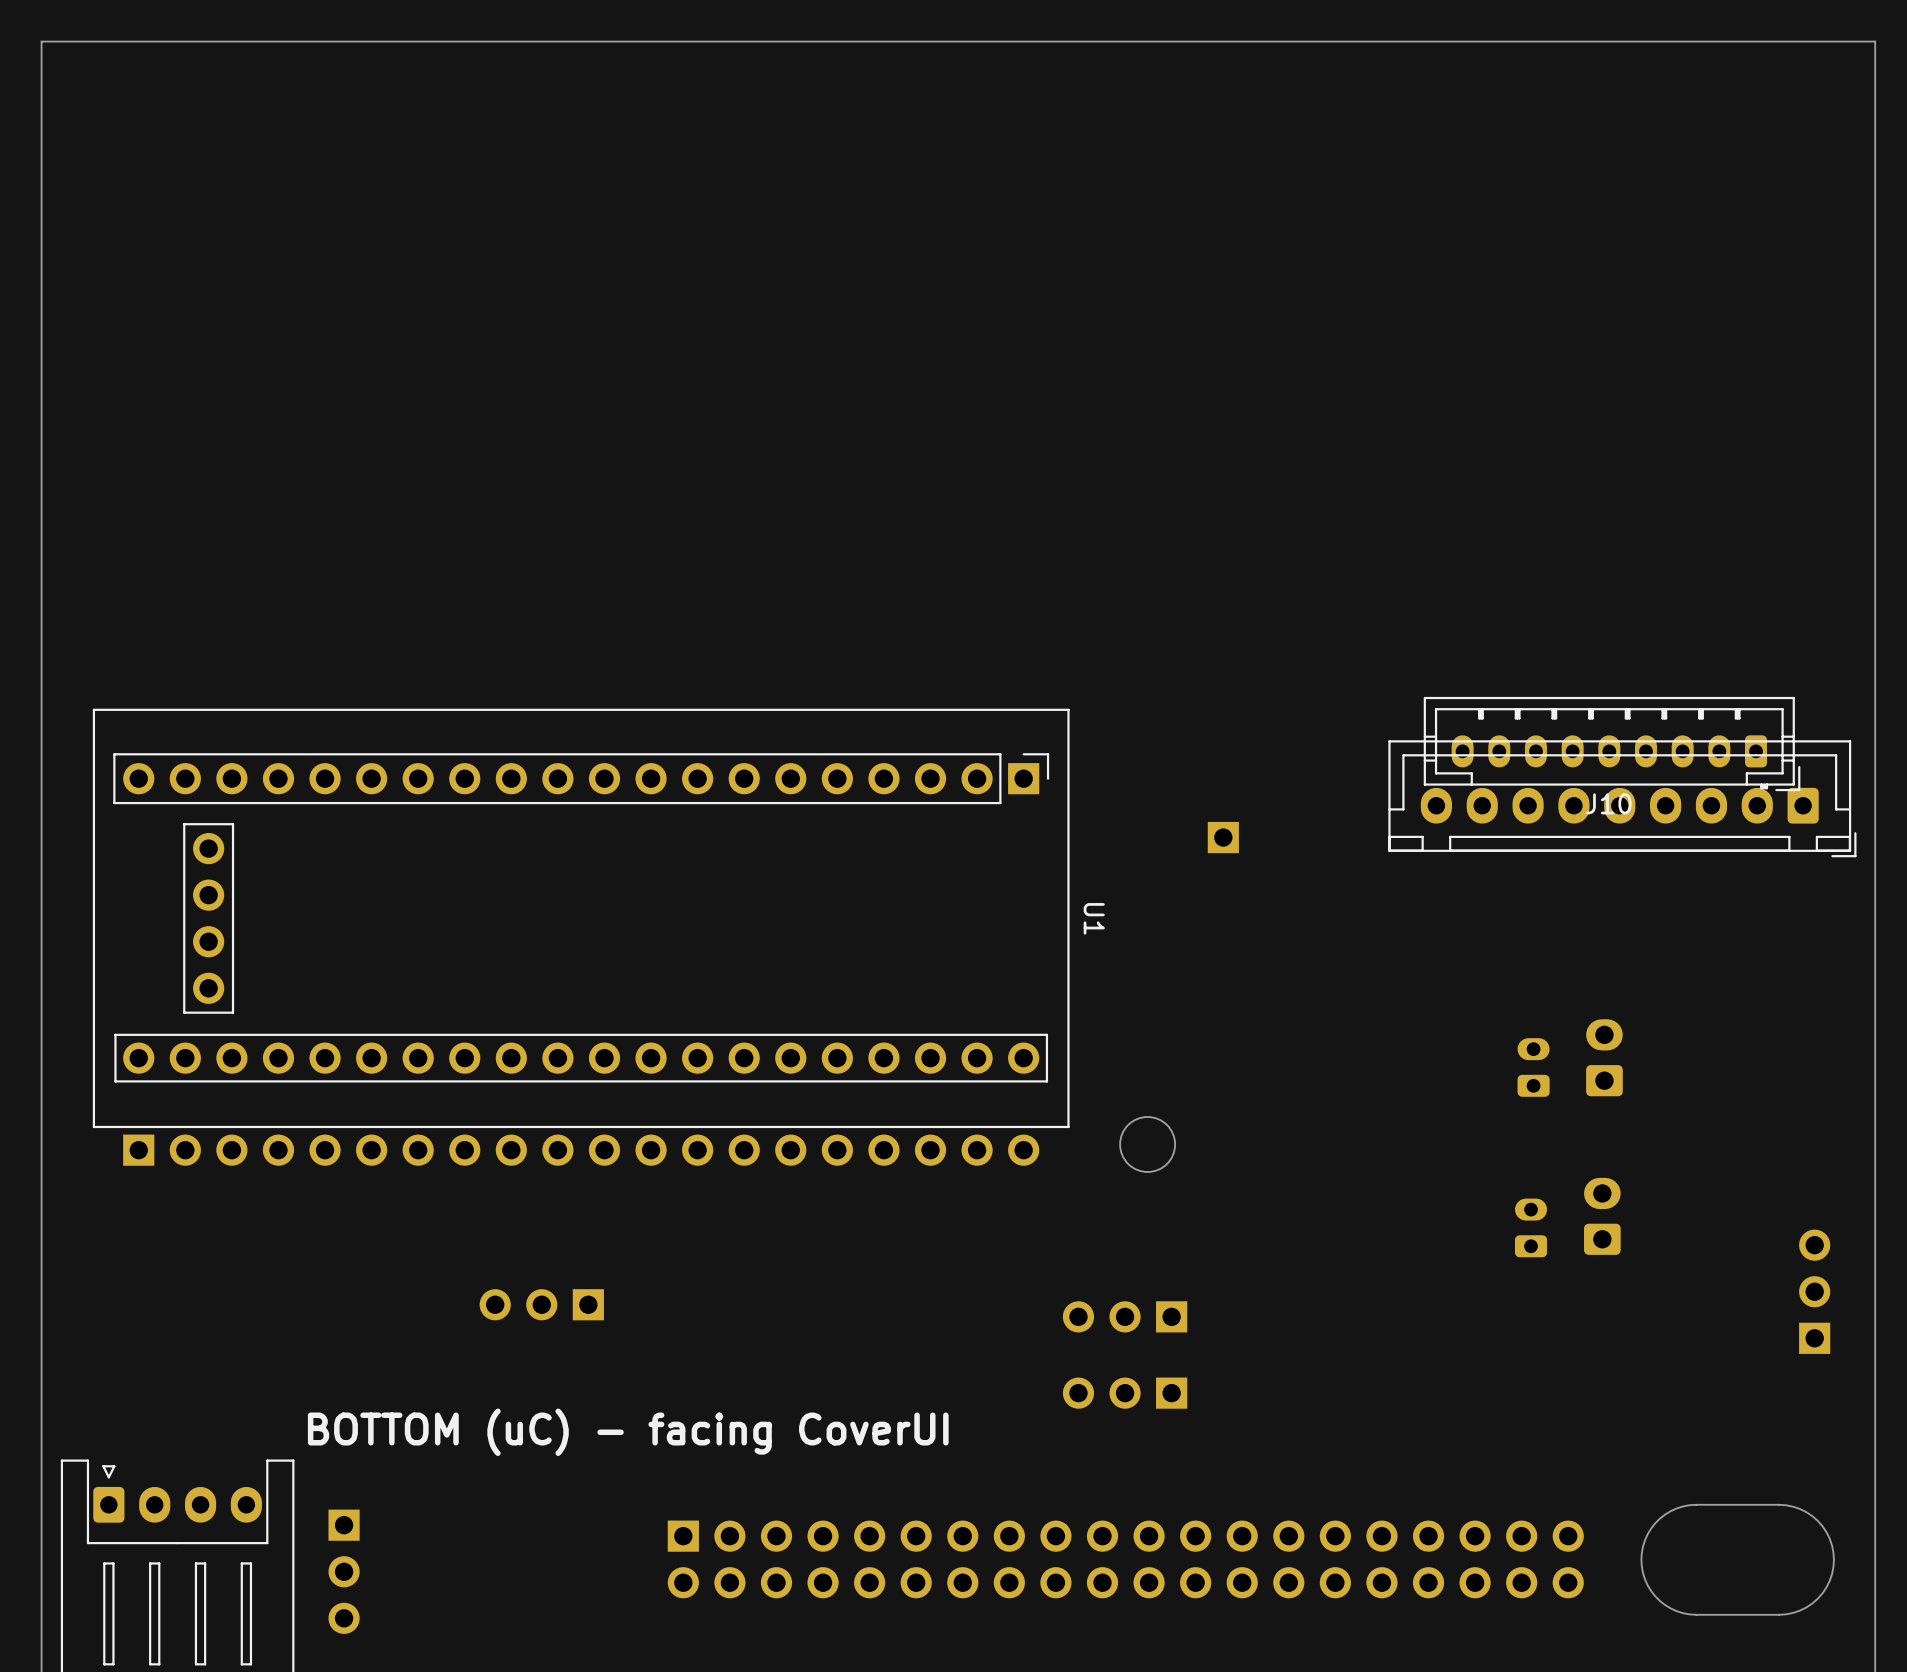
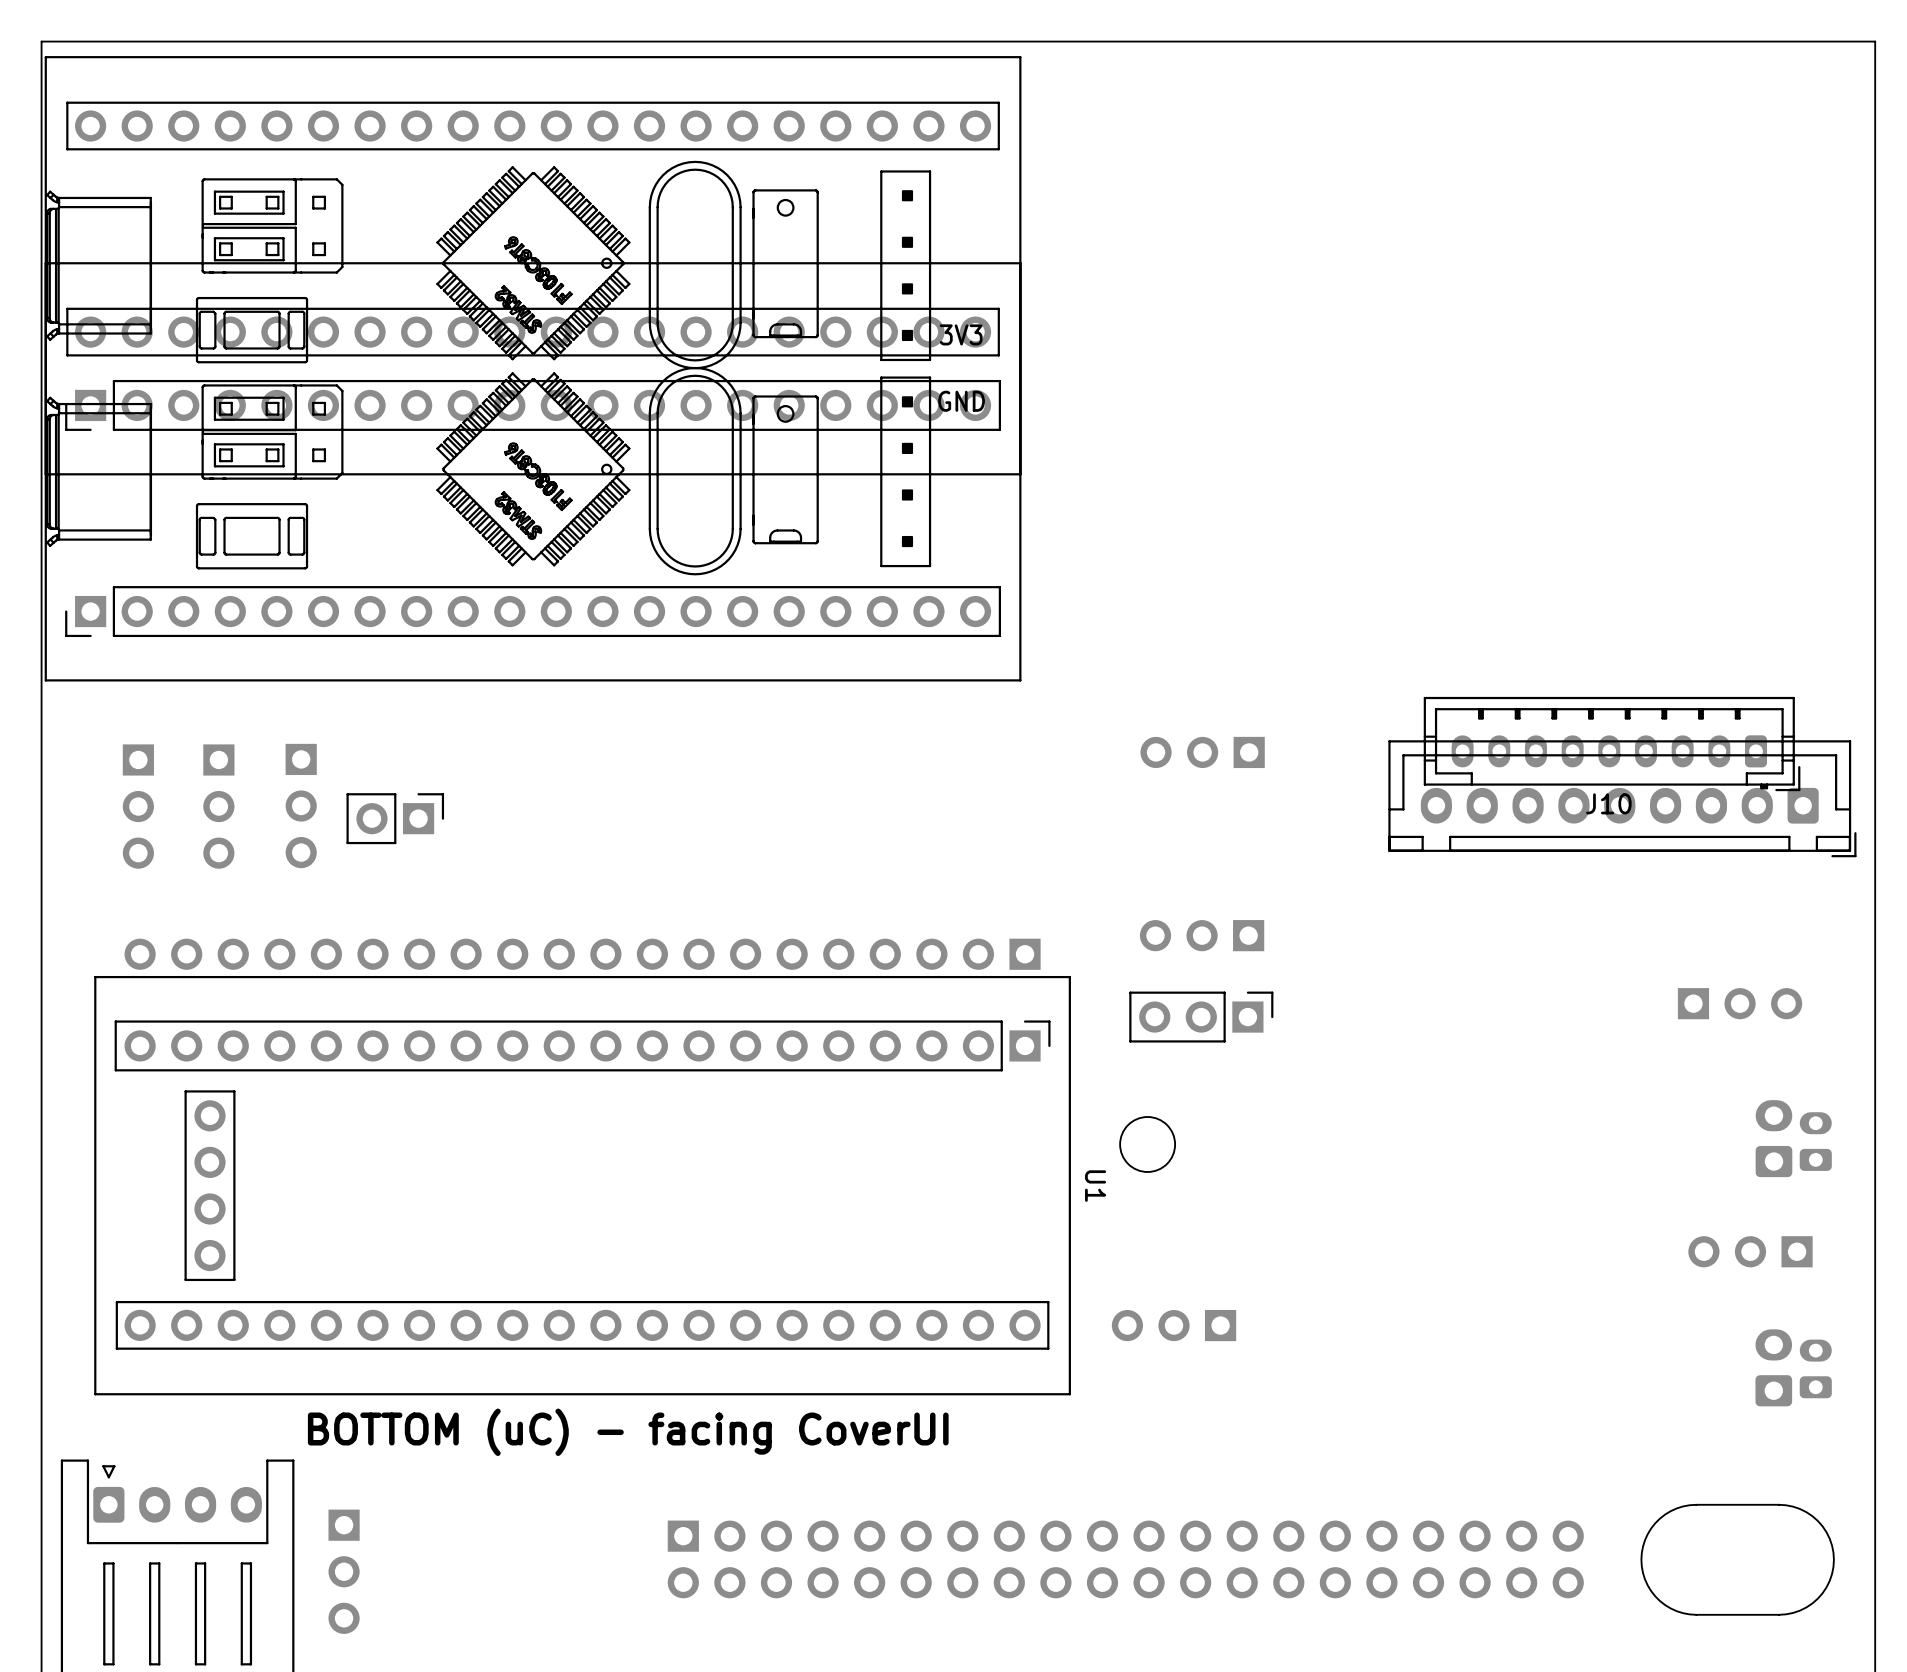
part: none -> (533, 265)
part: none -> (533, 471)
part: none -> (1202, 752)
part: none -> (138, 806)
part: none -> (218, 806)
part: none -> (301, 806)
part: none -> (395, 818)
part: (1223, 837) -> none
U1 position: (581, 918) -> (582, 1185)
part: none -> (1202, 935)
part: none -> (1740, 1003)
part: none -> (1201, 1017)
part: (1604, 1057) -> none
part: (1533, 1067) -> none
part: none -> (1773, 1138)
part: none -> (1815, 1141)
part rotation: 0° (581, 1150) -> 180° (582, 954)
part: (1602, 1216) -> none
part: (1531, 1227) -> none
part rotation: 0° (1814, 1291) -> 90° counterclockwise (1750, 1251)
part position: (1814, 1291) -> (1750, 1251)
part: (541, 1304) -> none
part: (1125, 1316) -> none
part: none -> (1174, 1325)
part: none -> (1773, 1367)
part: none -> (1815, 1368)
part: (1125, 1393) -> none

